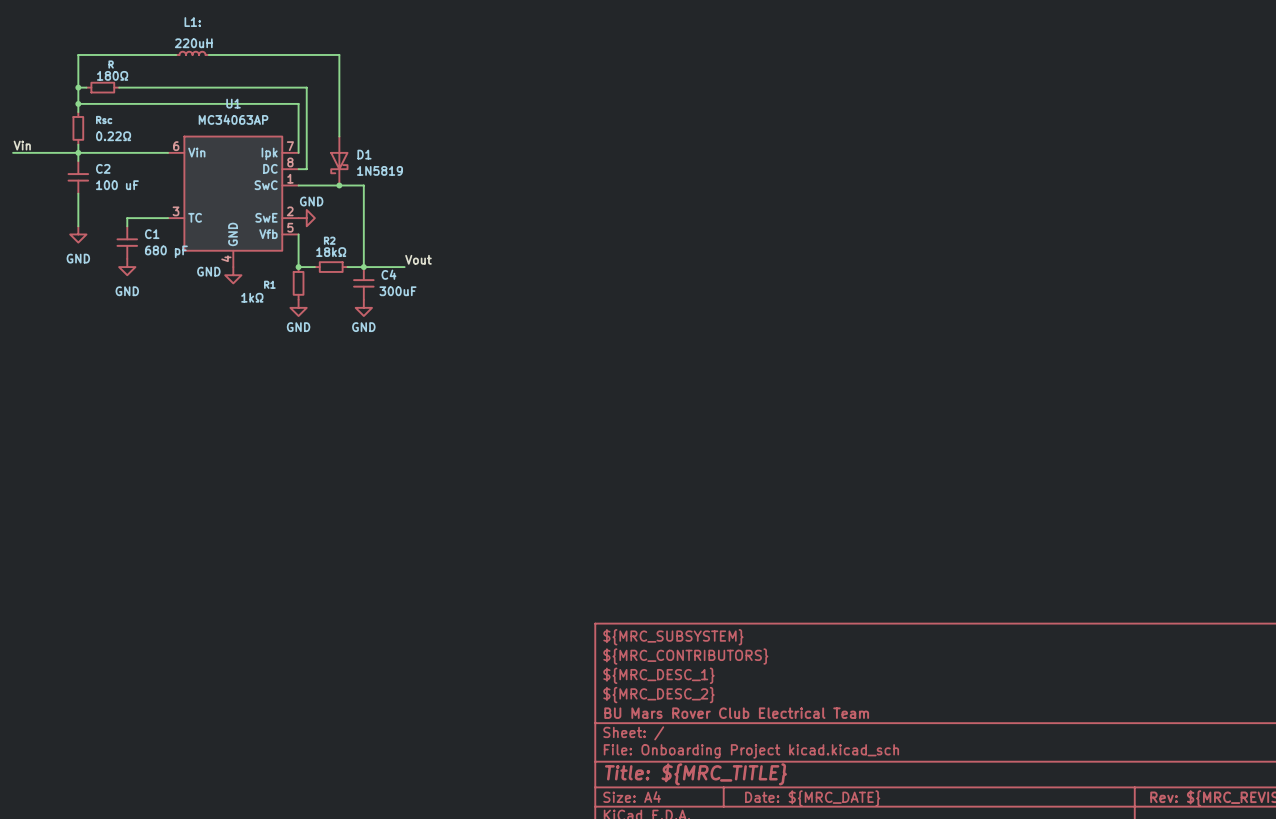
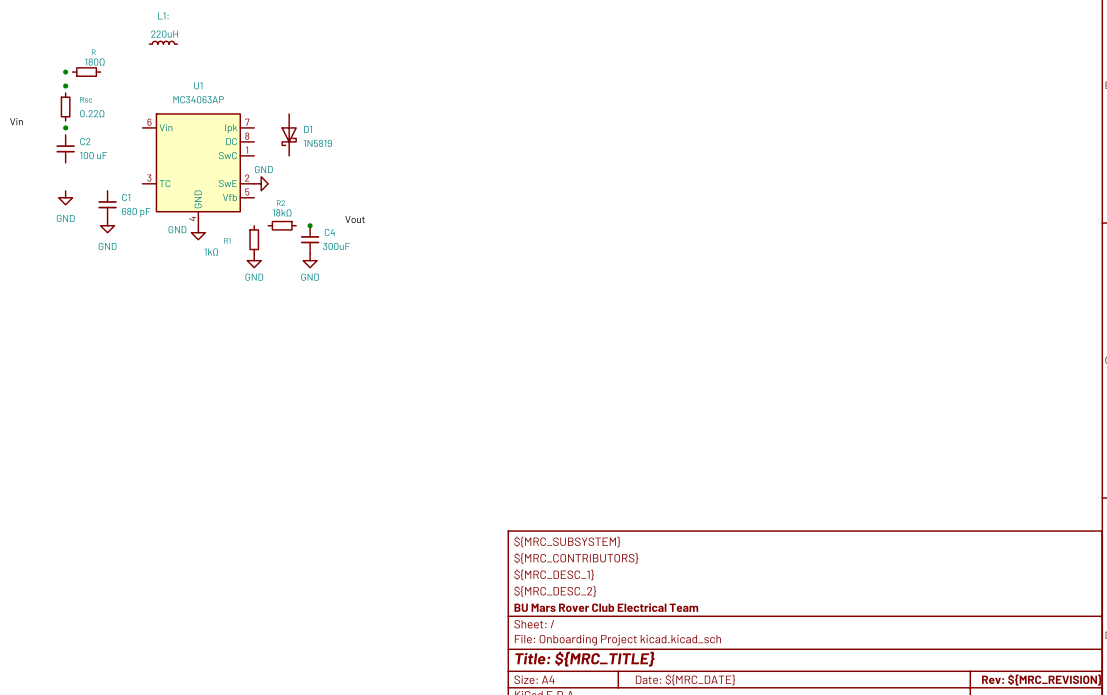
wire: (176, 54) (78, 54) (78, 112) -> none
wire: (208, 54) (339, 54) (339, 136) -> none
wire: (78, 87) (86, 87) -> none
wire: (119, 87) (306, 87) (306, 169) (298, 169) -> none
wire: (78, 103) (298, 103) (298, 152) -> none
wire: (78, 144) (78, 161) -> none
wire: (13, 152) (168, 152) -> none
wire: (298, 185) (363, 185) (363, 267) -> none
junction: (339, 185) -> none
wire: (78, 193) (78, 226) -> none
wire: (168, 218) (127, 218) (127, 226) -> none
wire: (298, 234) (298, 267) (314, 267) -> none
junction: (298, 267) -> none
wire: (347, 267) (404, 267) -> none

